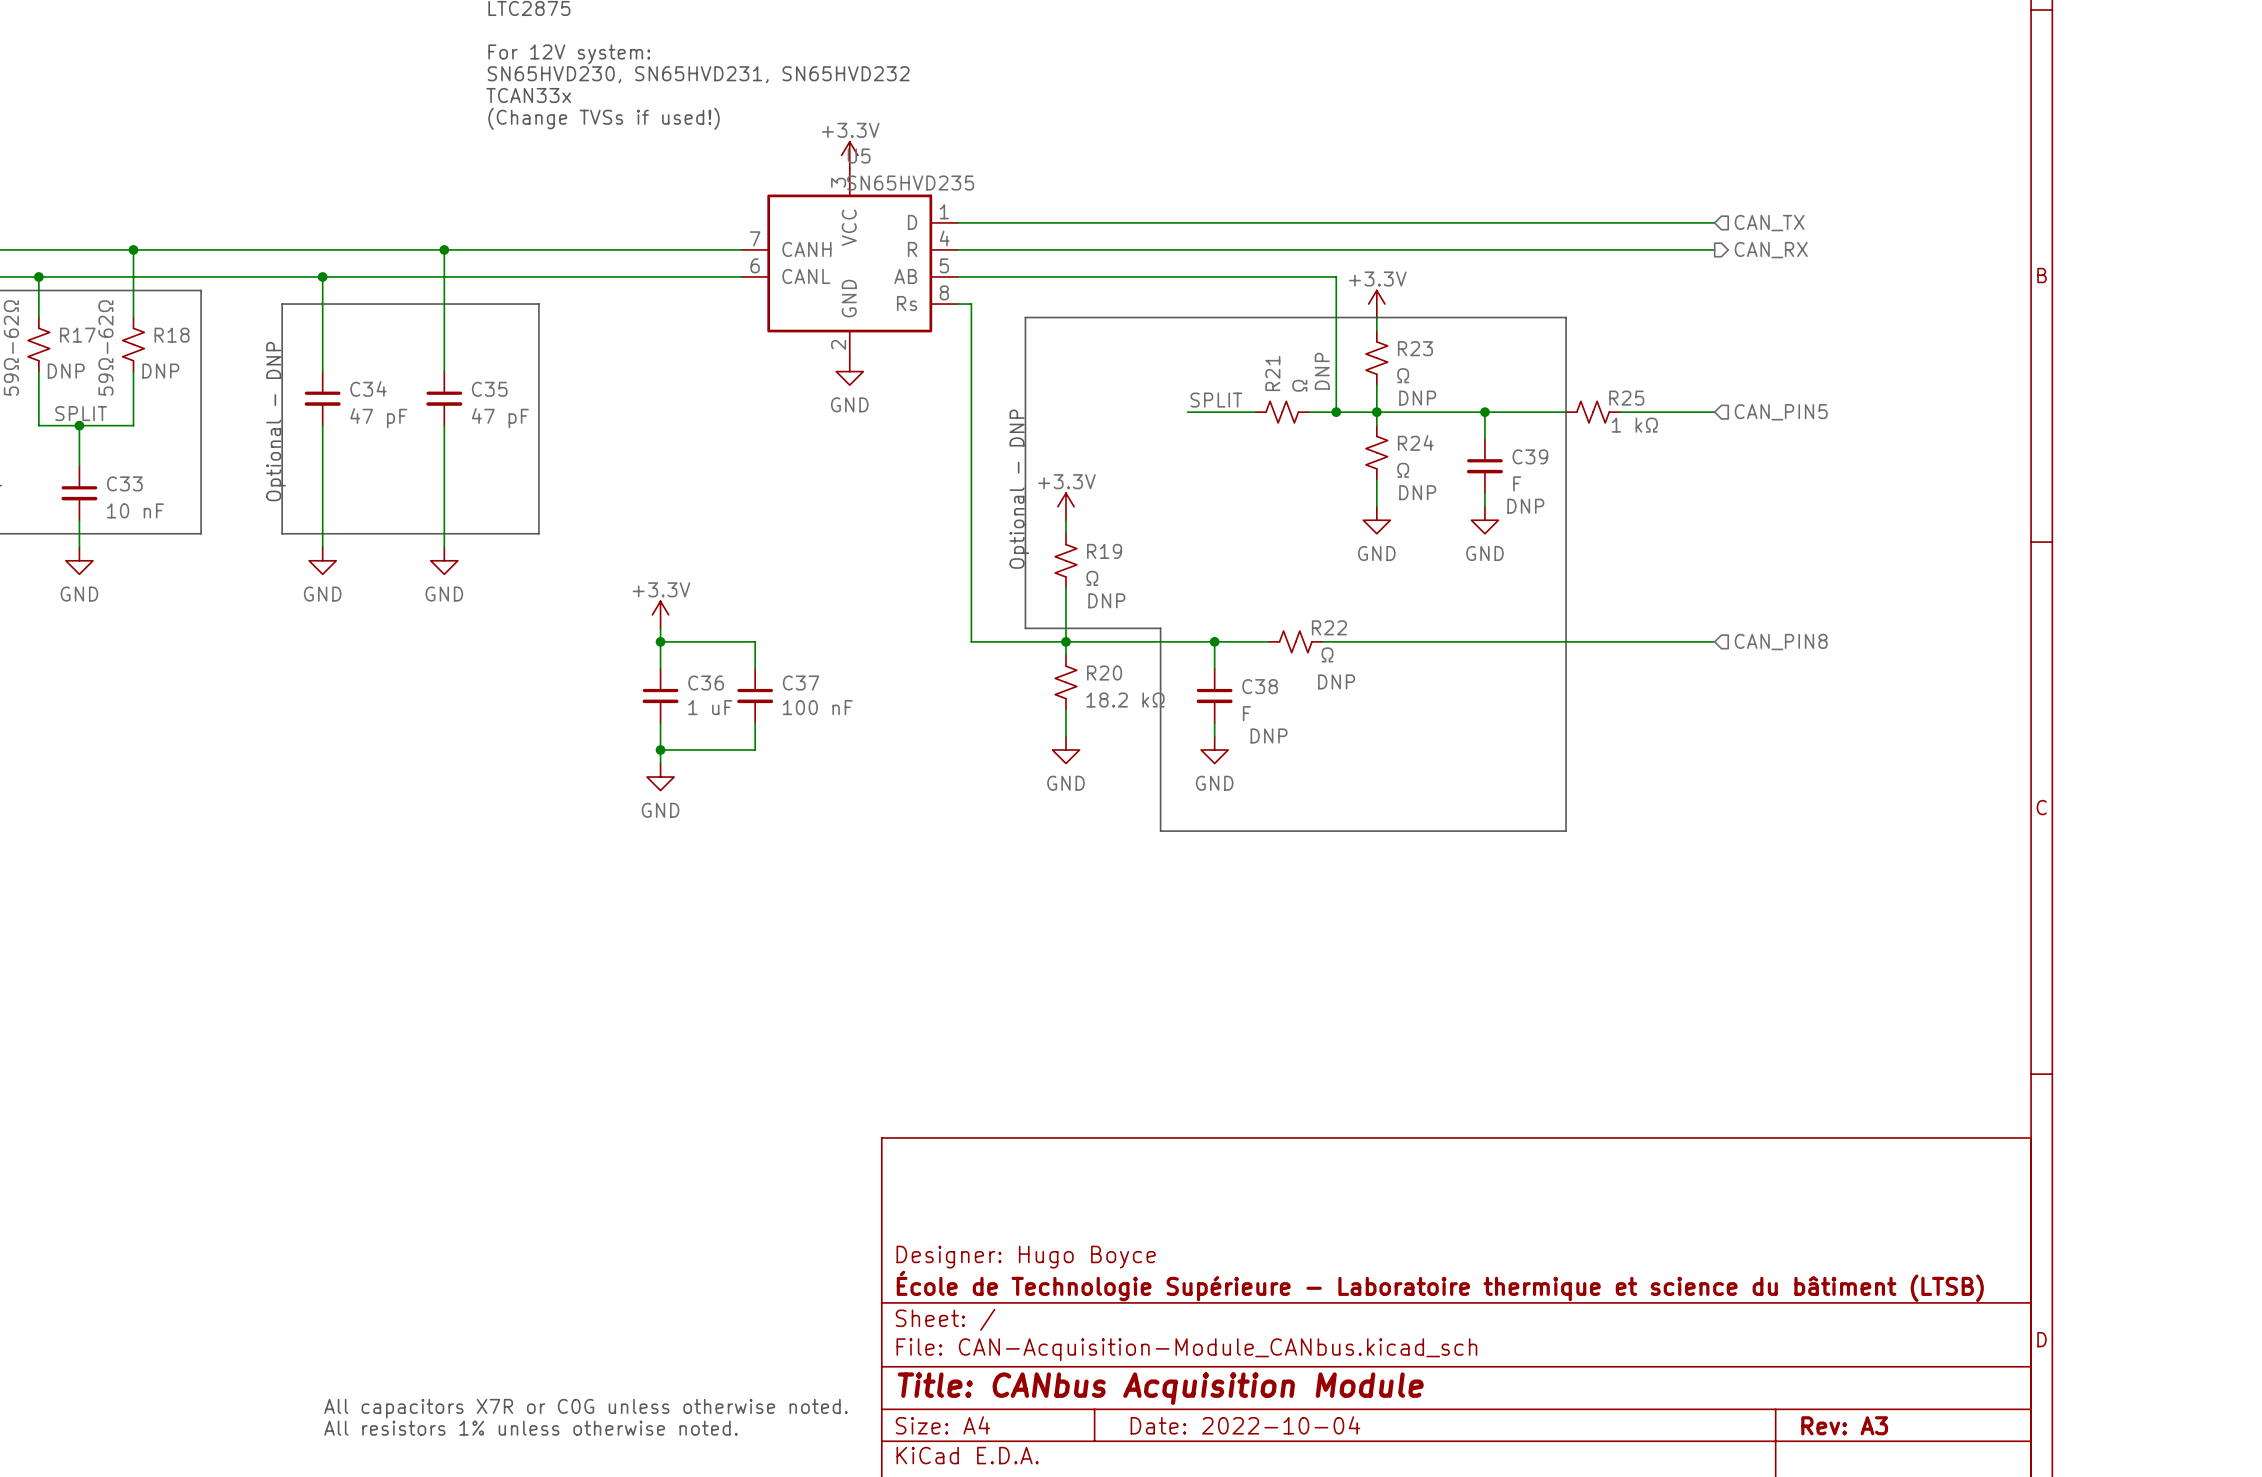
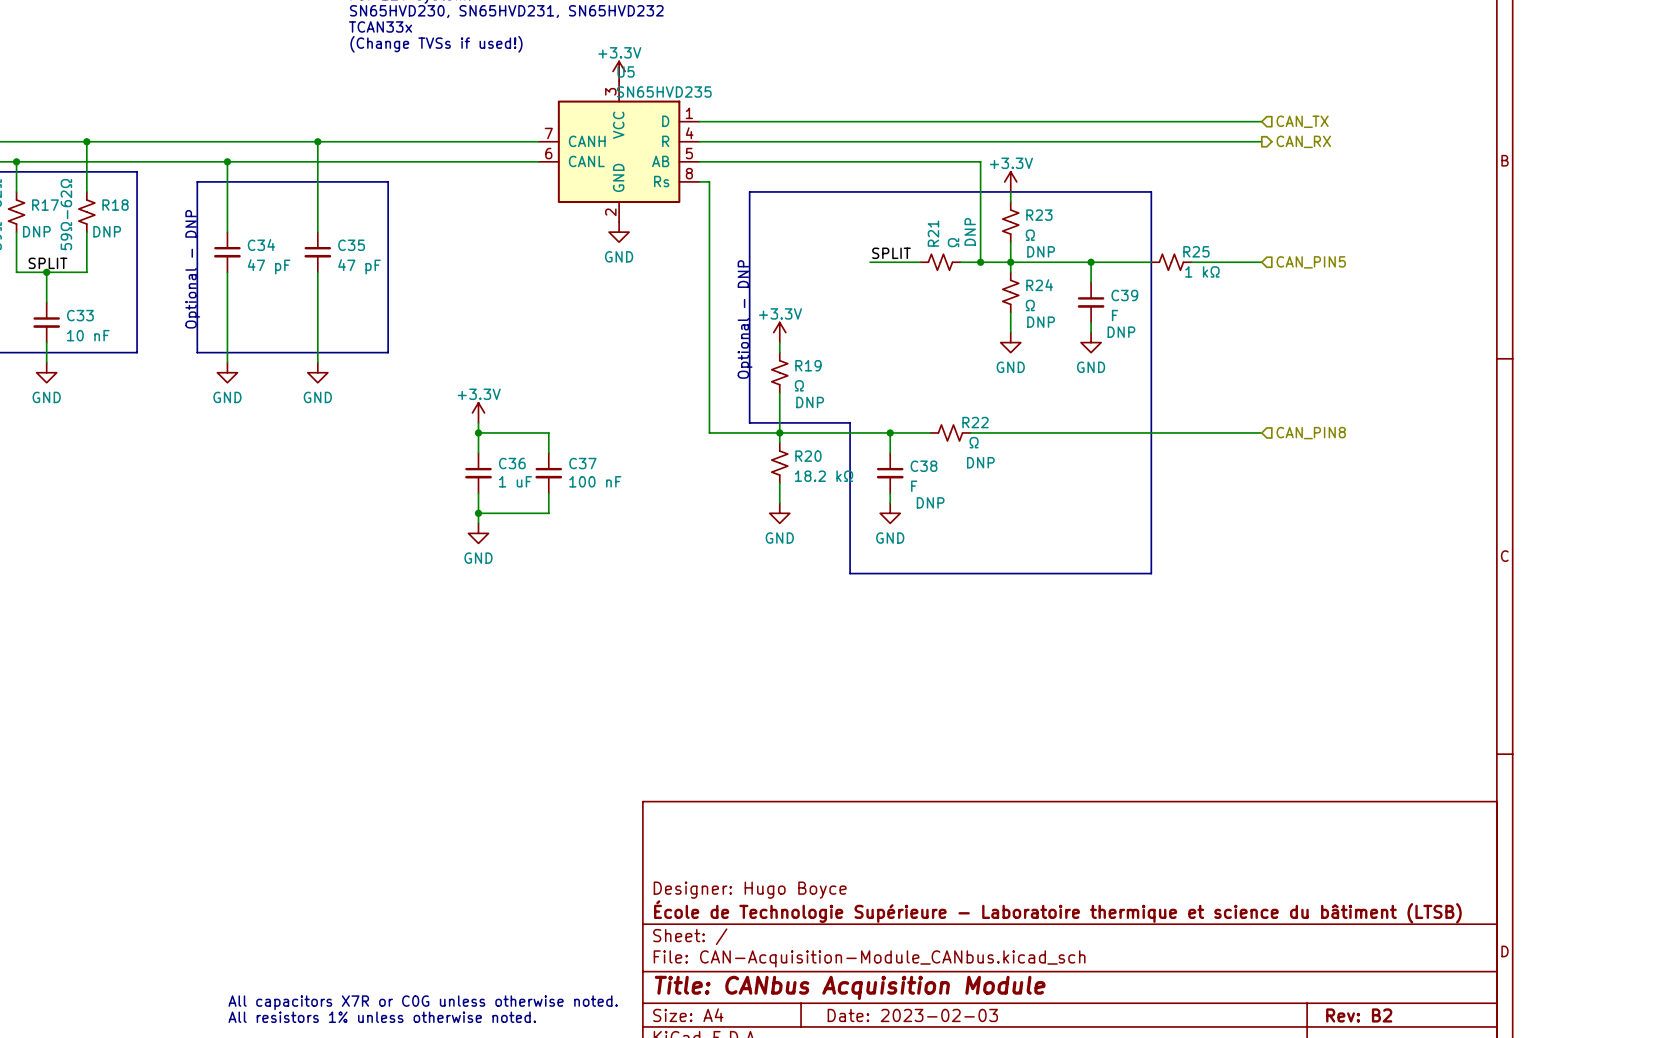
title block: Date: 2022-10-04 (1245, 1425) -> Date: 2023-02-03 (912, 1015)
title block: Rev: A3 (1844, 1425) -> Rev: B2 (1359, 1015)

